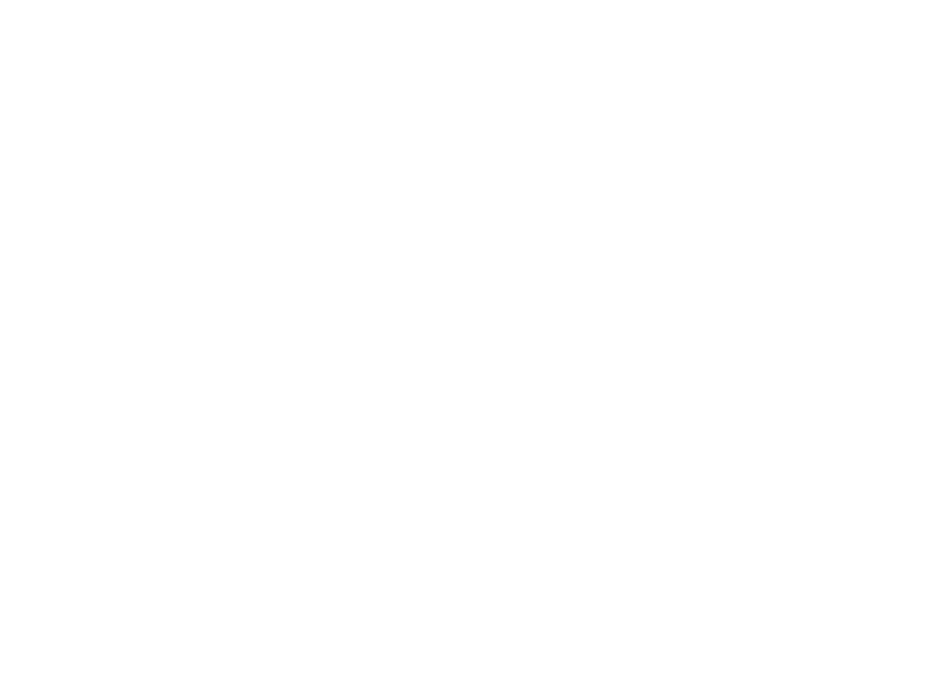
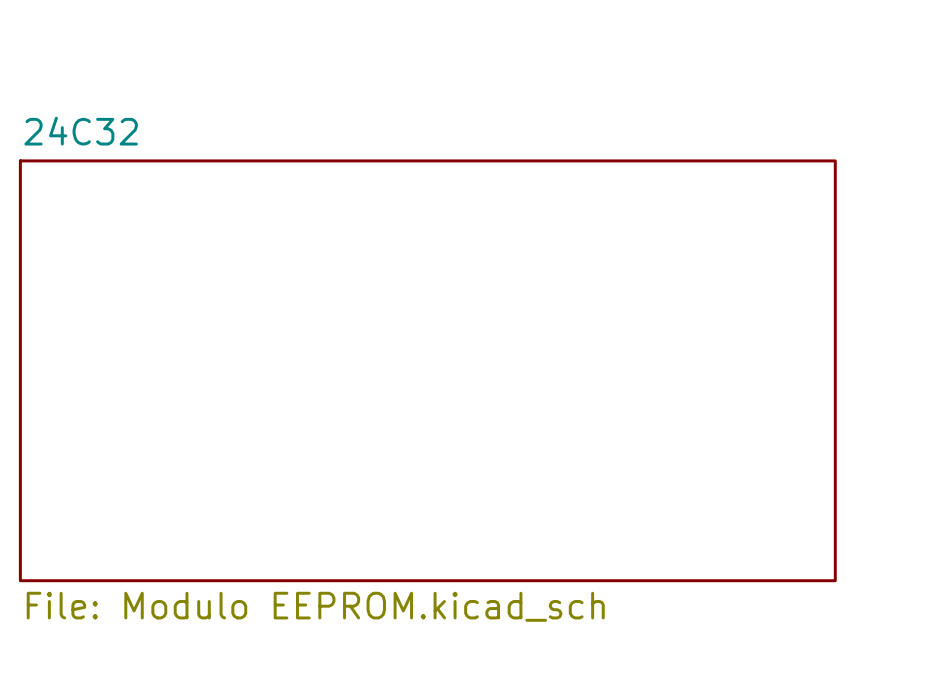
sheet 24C32: none -> File: Modulo EEPROM.kicad_sch (427, 370)

